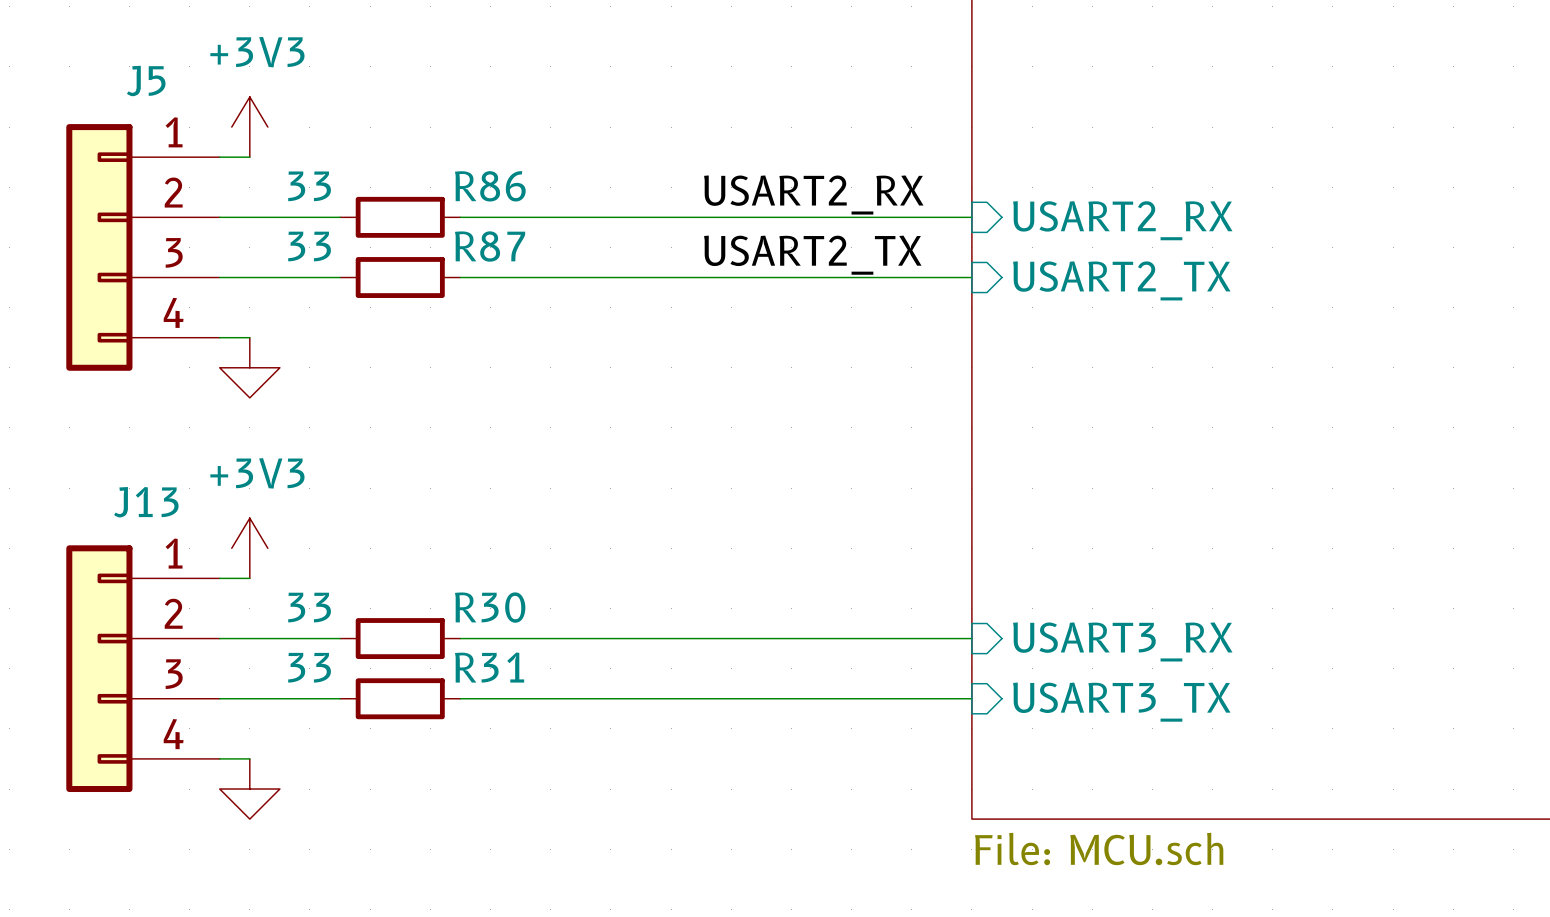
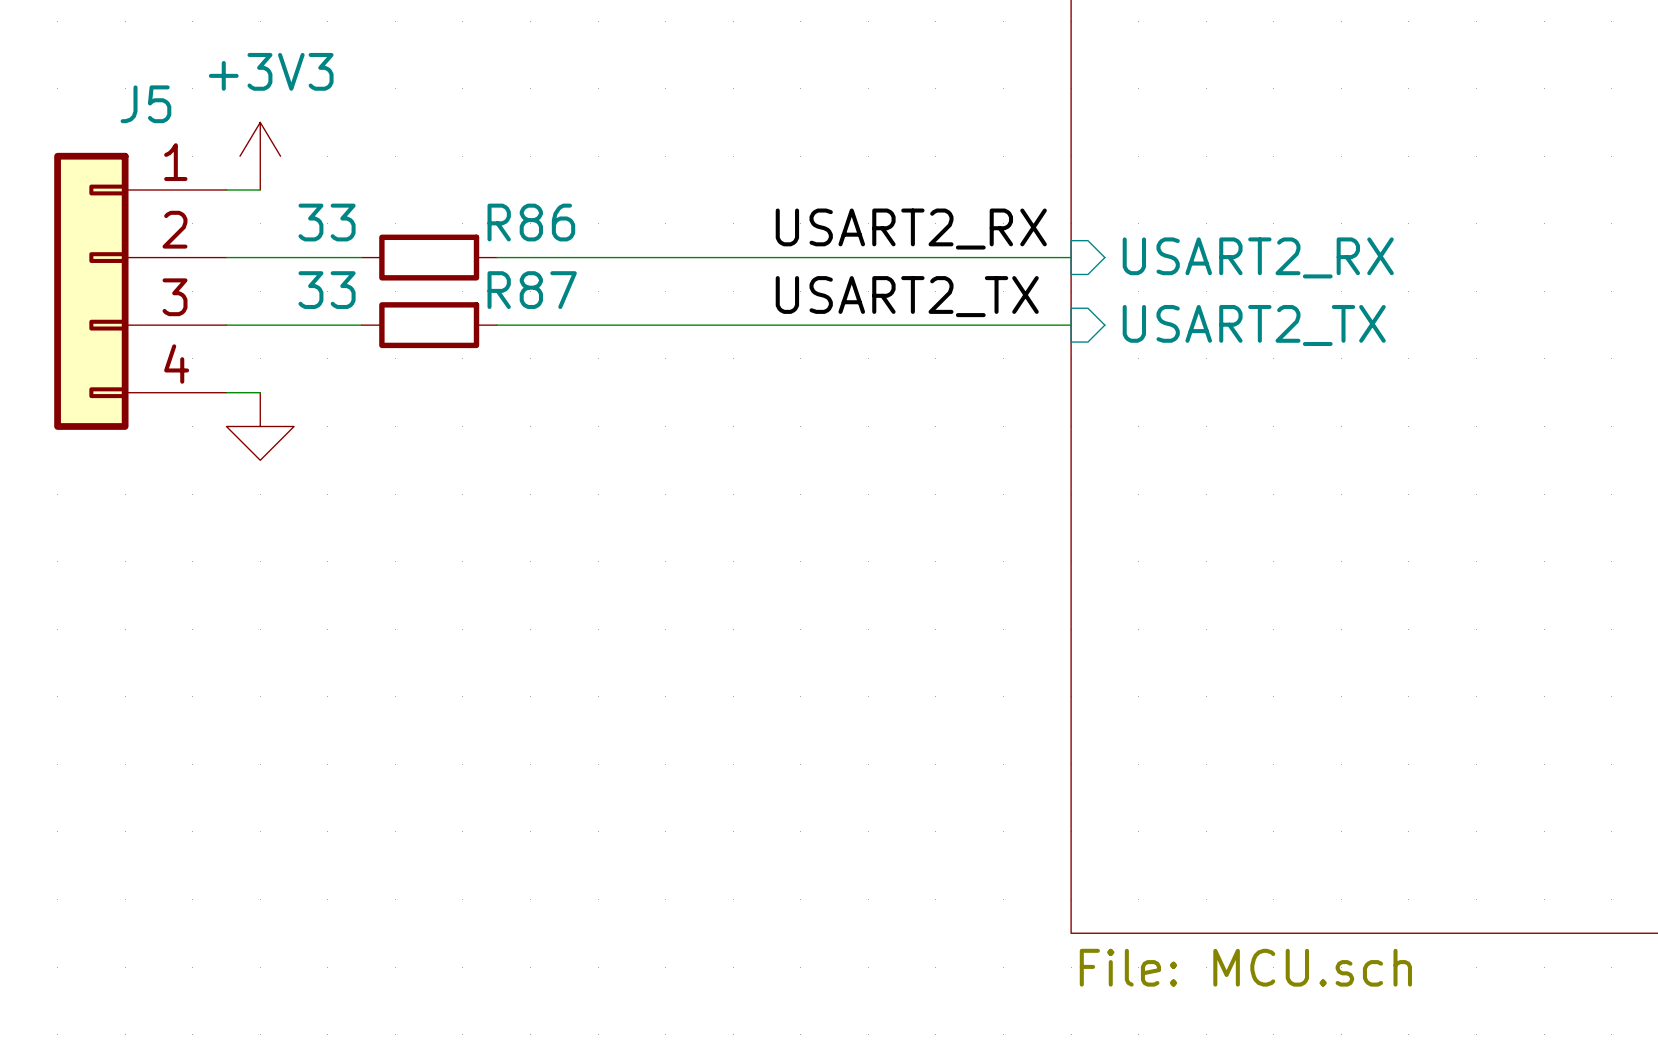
power symbol: +3V3 (249, 548) -> none
wire: (219, 578) (249, 578) -> none
wire: (219, 638) (340, 638) -> none
R30: 33 (400, 638) -> none
wire: (460, 638) (971, 638) -> none
sheet pin: USART3_RX (1122, 641) -> none
J13: (143, 668) -> none
wire: (219, 698) (340, 698) -> none
R31: 33 (400, 698) -> none
wire: (460, 698) (971, 698) -> none
sheet pin: USART3_TX (1121, 702) -> none
wire: (219, 758) (249, 758) -> none
power symbol: (249, 789) -> none

